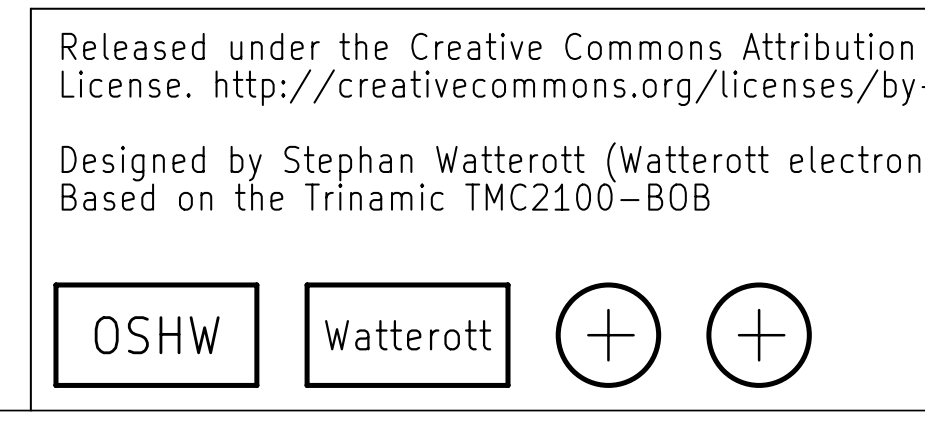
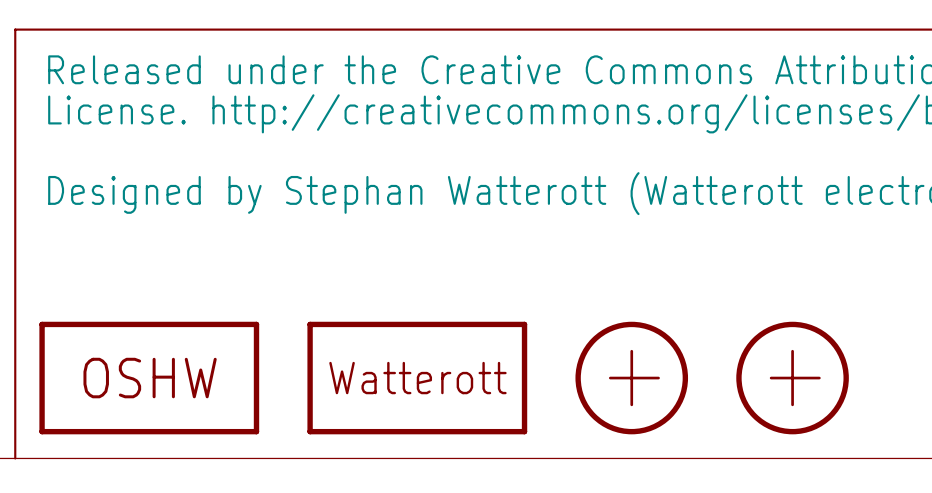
text: Based on the Trinamic TMC2100-BOB (385, 197) -> none

